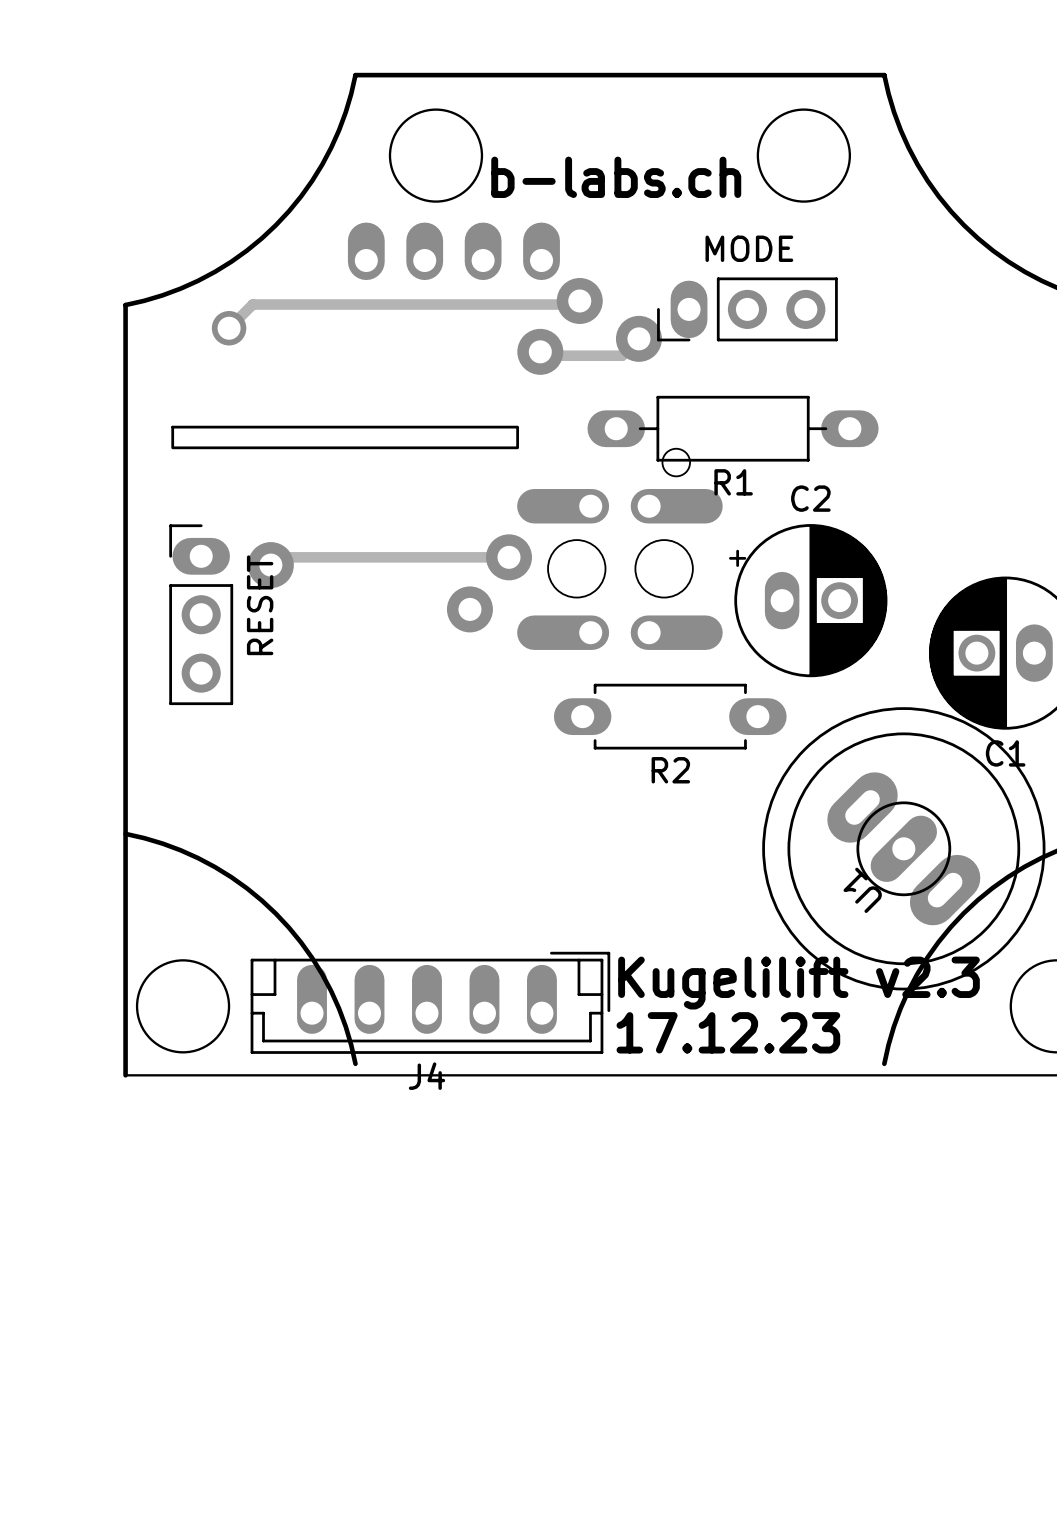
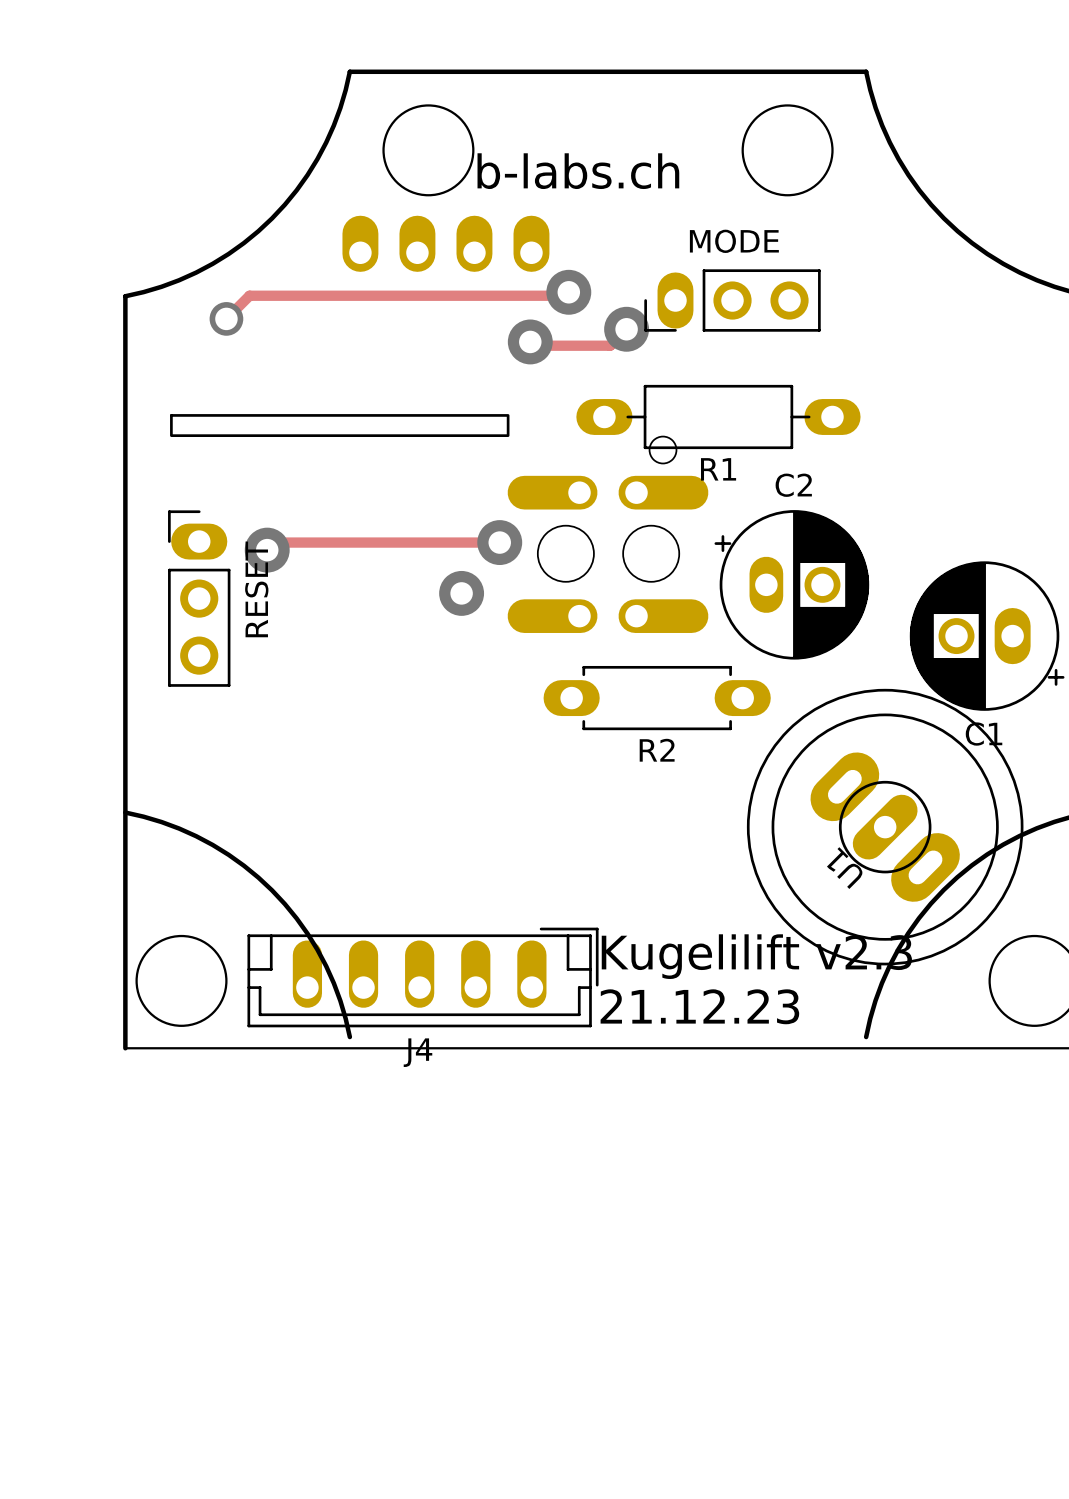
text: 17.12.23 (728, 1032) -> 21.12.23 (699, 1006)

